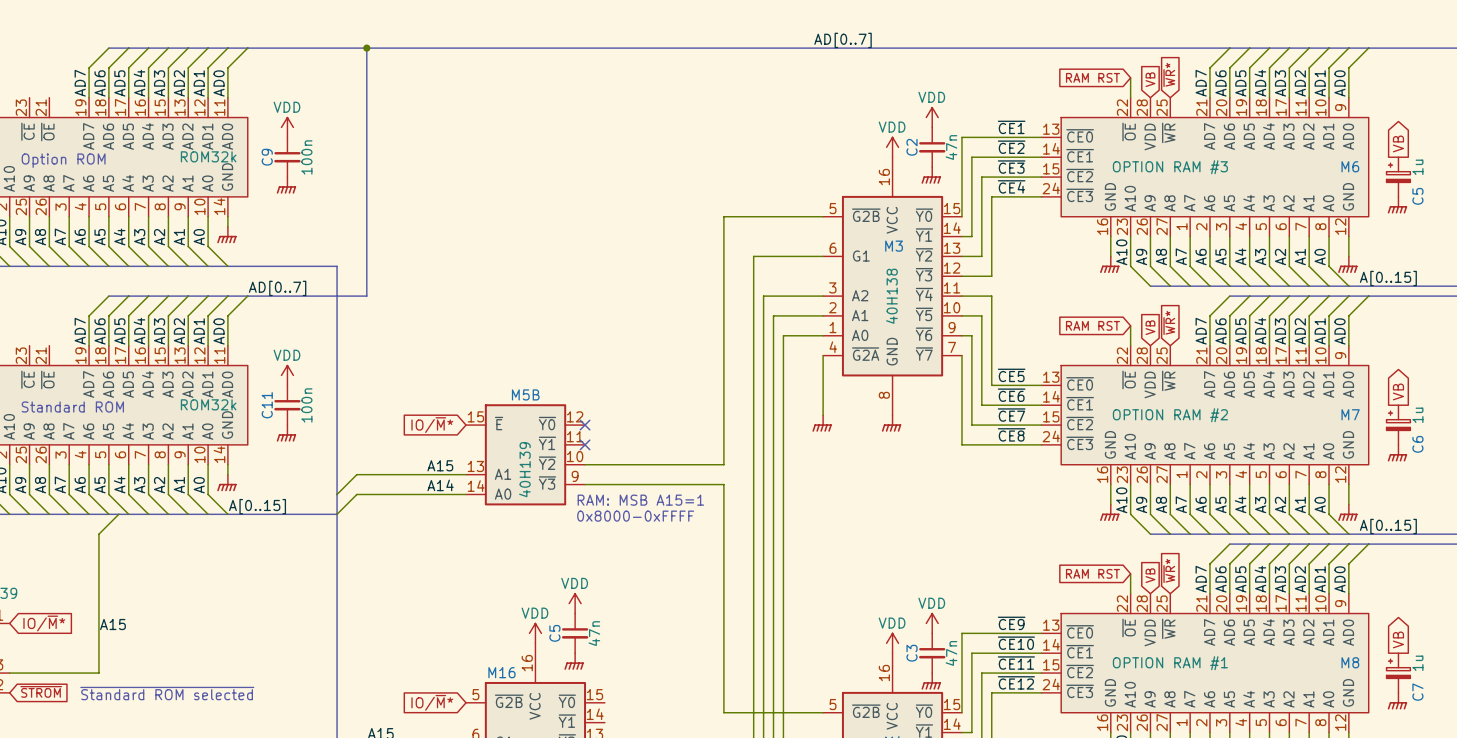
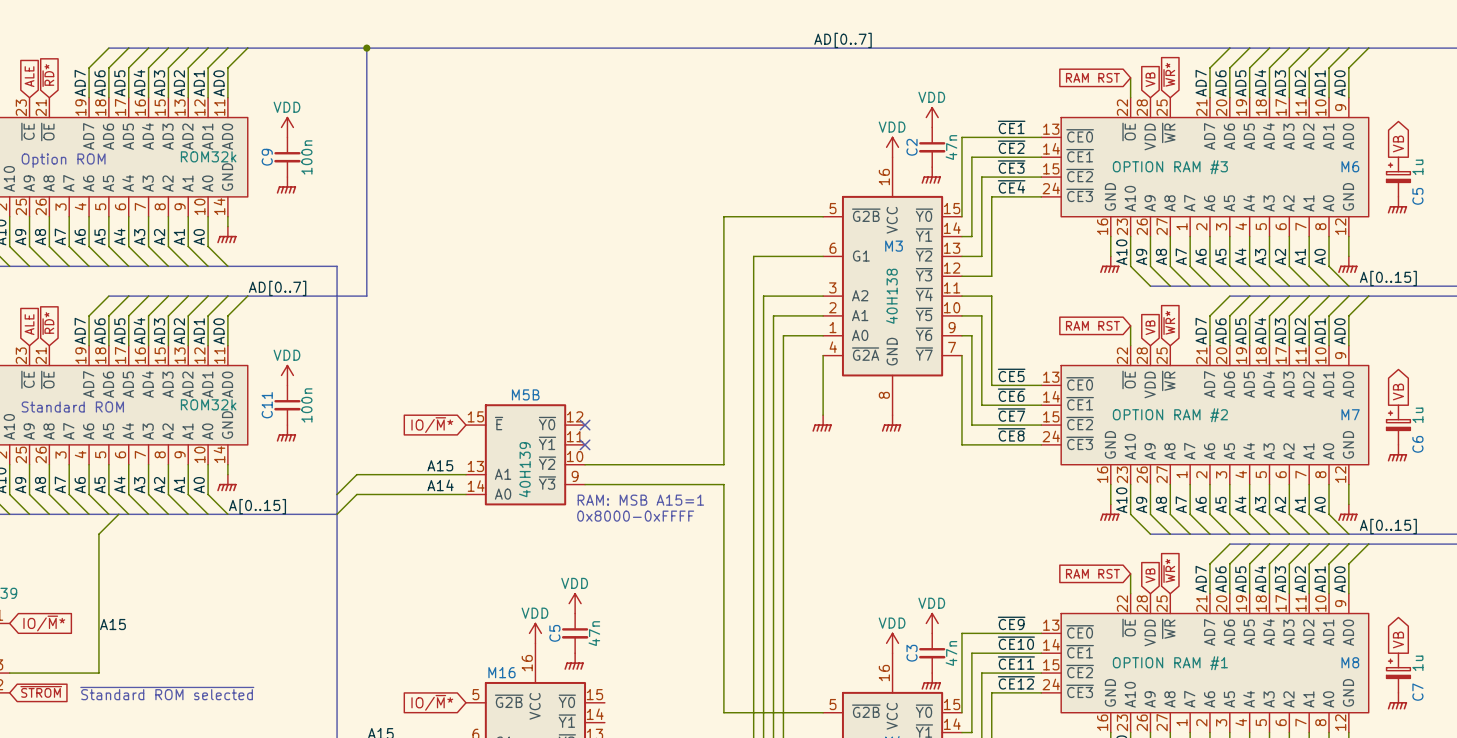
global label: none -> ~{RD}* (48, 75)
global label: none -> ALE (29, 76)
global label: none -> ~{RD}* (48, 323)
global label: none -> ALE (29, 324)

